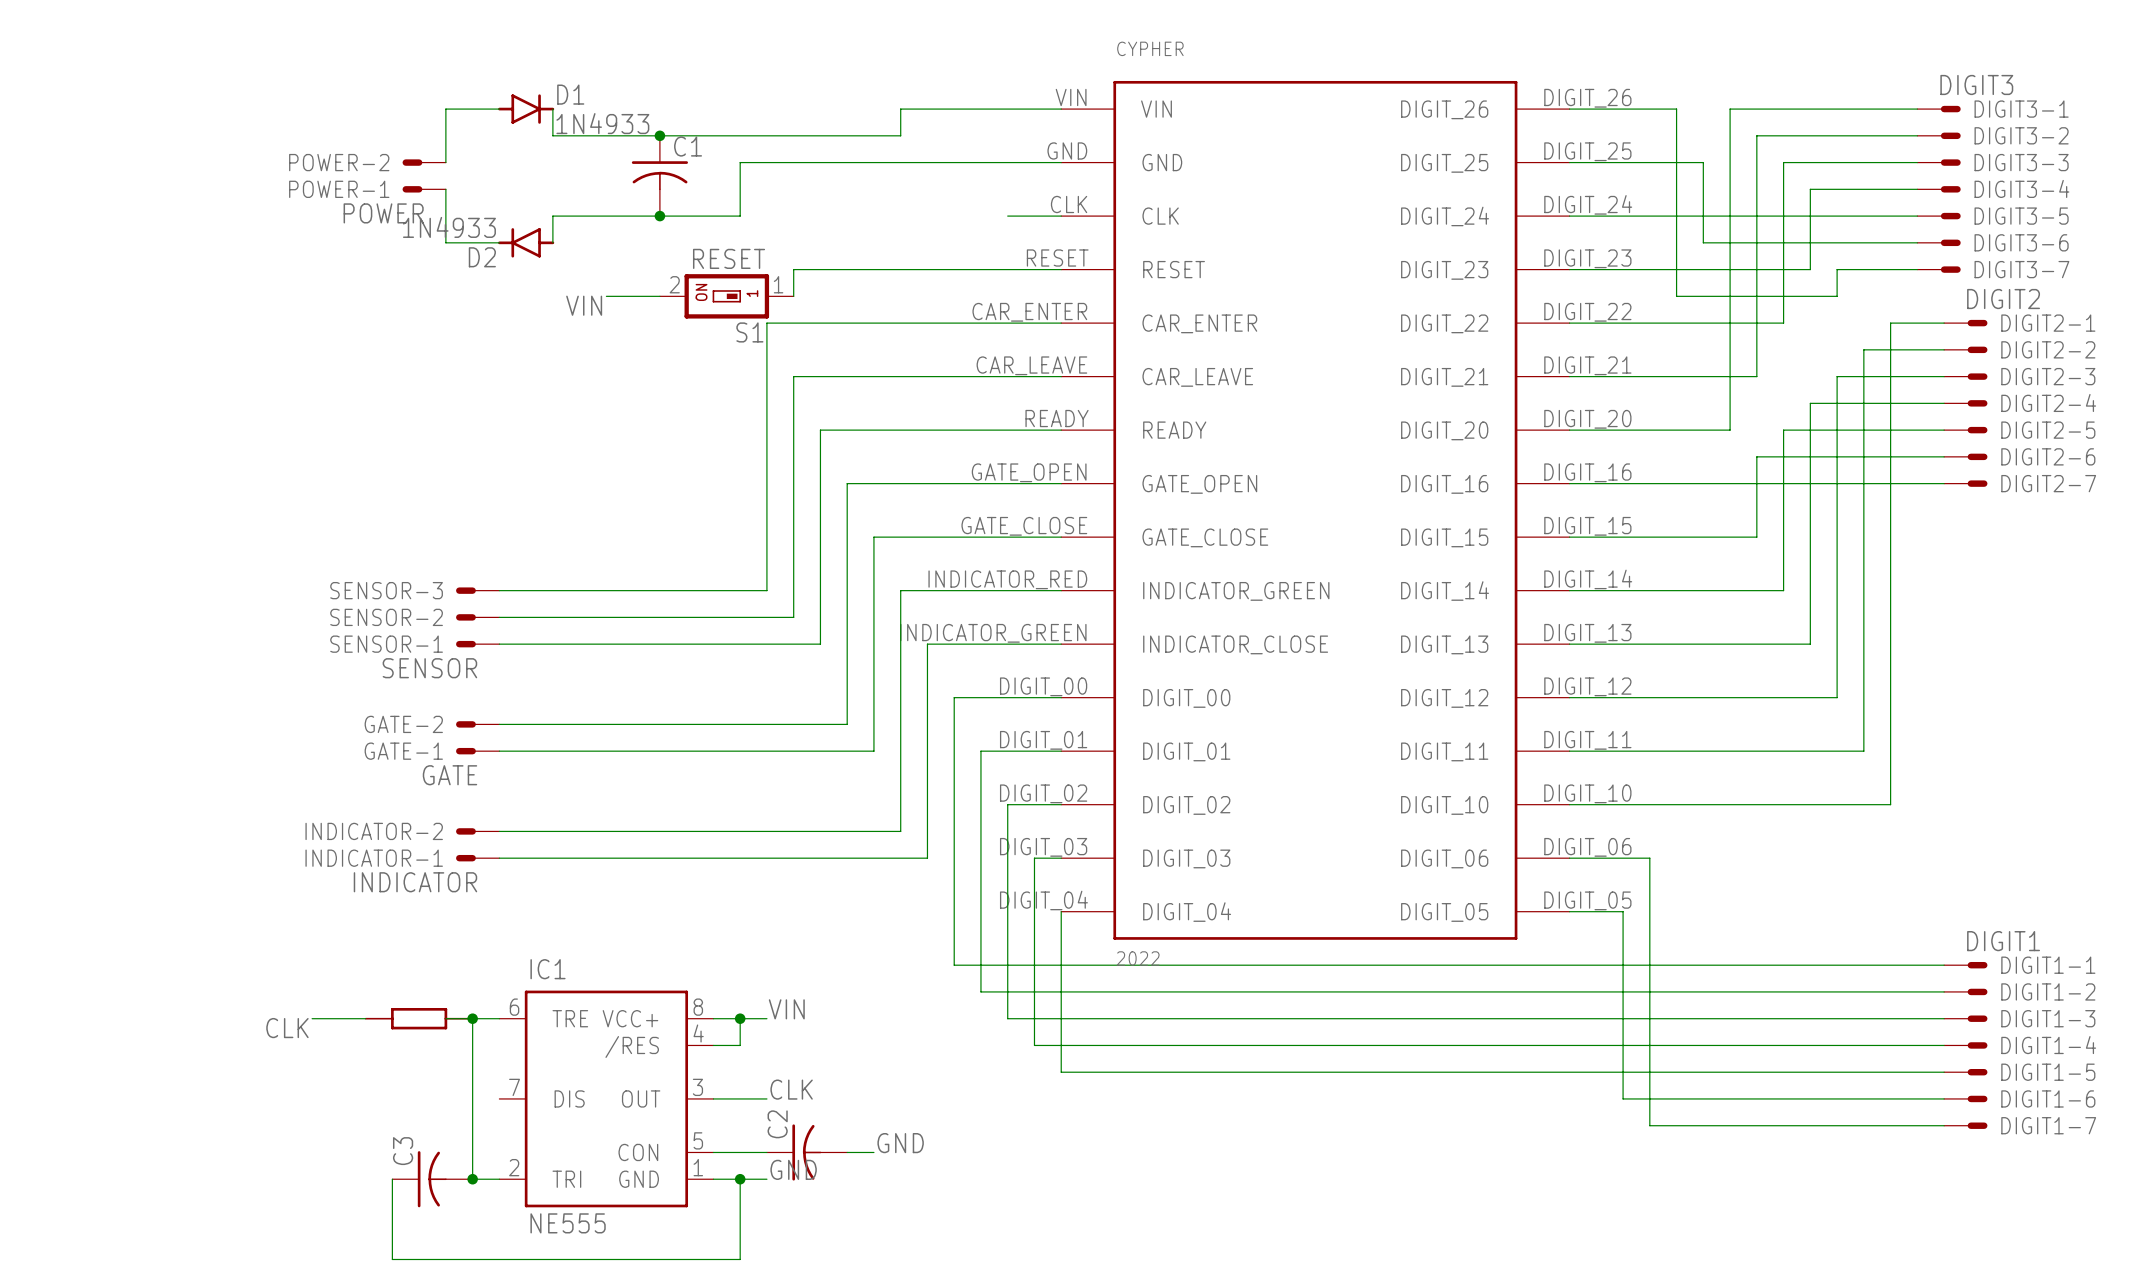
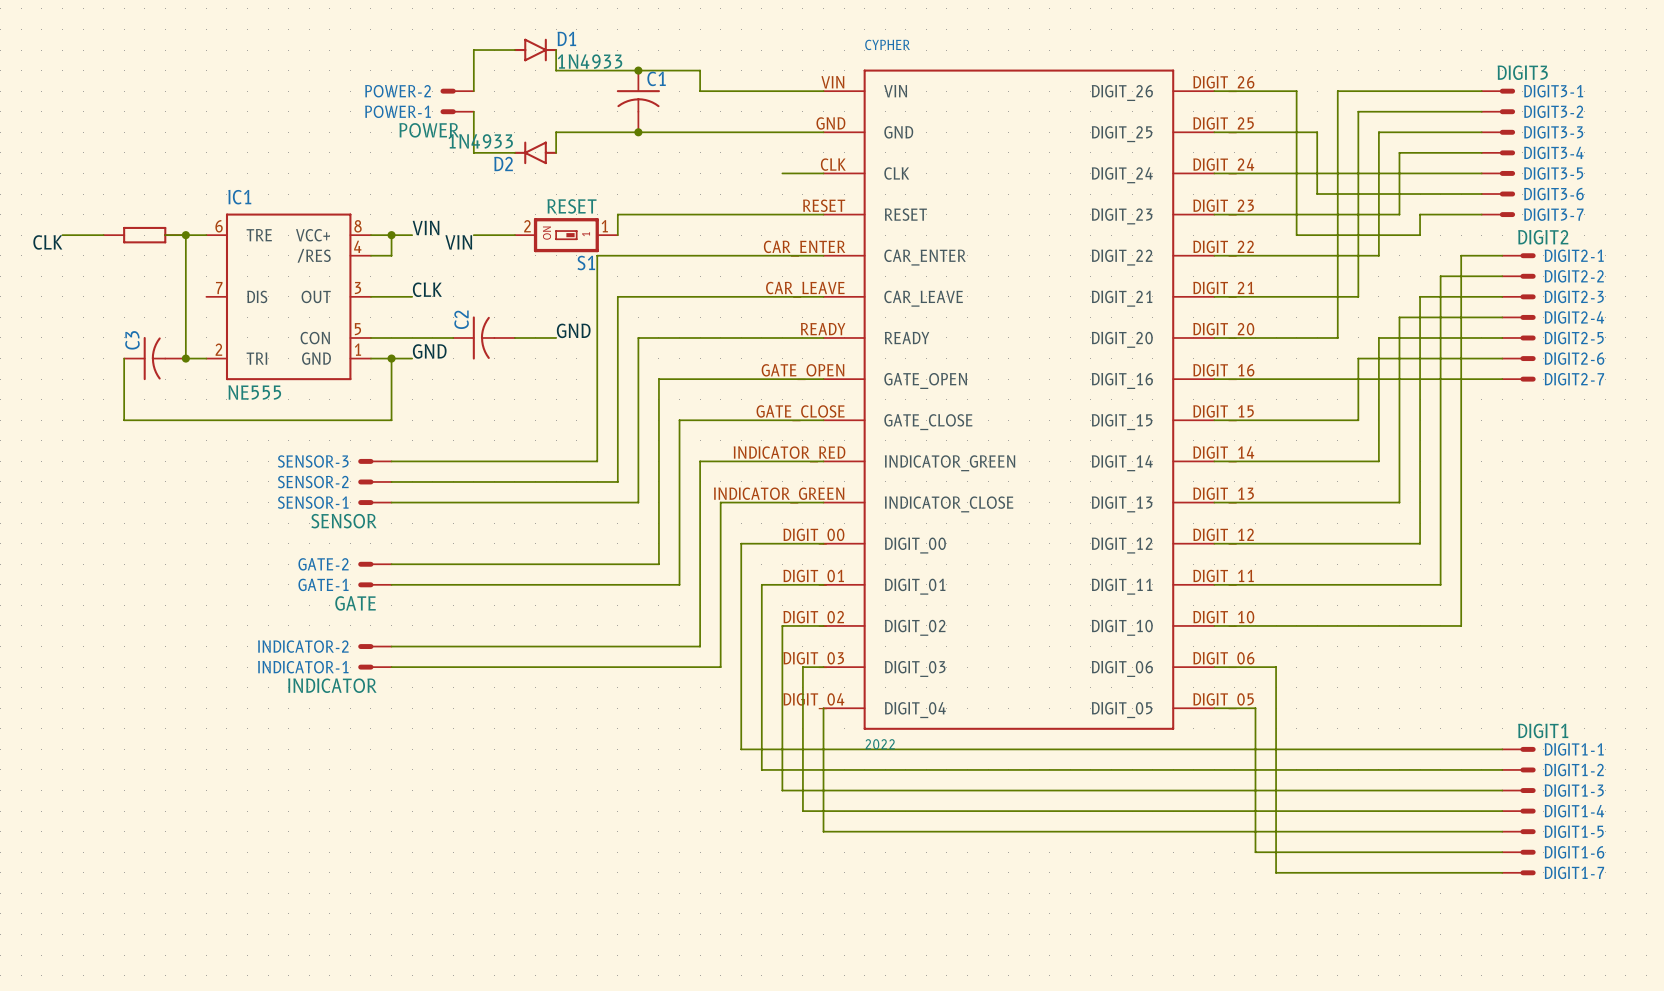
junction: none -> (638, 70)
wire: (499, 109) (445, 109) (445, 162) -> (514, 50) (473, 50) (473, 91)
D1 position: (526, 109) -> (535, 50)
wire: (552, 109) (552, 135) (900, 135) (900, 109) -> (556, 50) (556, 70) (700, 70) (700, 91)
junction: (659, 135) -> none
POWER-2 position: (424, 162) -> (457, 91)
wire: (740, 162) (740, 216) (552, 216) (552, 242) -> (576, 132) (556, 132) (556, 152)
junction: none -> (638, 132)
C1 position: (659, 175) -> (638, 101)
POWER-1 position: (424, 189) -> (457, 111)
wire: (445, 189) (445, 242) (499, 242) -> (473, 111) (473, 152) (514, 152)
junction: (659, 216) -> none
D2 position: (526, 242) -> (535, 152)
label: none -> VIN (426, 228)
wire: none -> (62, 235) (103, 235)
part: none -> (144, 235)
wire: none -> (165, 235) (206, 235)
wire: none -> (185, 235) (185, 358) (206, 358)
junction: none -> (185, 235)
wire: none -> (370, 235) (412, 235)
wire: none -> (391, 235) (391, 255) (370, 255)
junction: none -> (391, 235)
label: none -> CLK (47, 242)
label: none -> CLK (427, 289)
wire: none -> (370, 296) (412, 296)
label: none -> GND (573, 330)
wire: none -> (370, 337) (453, 337)
wire: none -> (514, 337) (556, 337)
label: none -> GND (429, 351)
wire: none -> (124, 358) (124, 420) (391, 420) (391, 358)
junction: none -> (185, 358)
wire: none -> (370, 358) (412, 358)
junction: none -> (391, 358)
label: VIN (786, 1009) -> none
wire: (312, 1018) (365, 1018) -> none
part: (419, 1018) -> none
wire: (445, 1018) (499, 1018) -> none
wire: (472, 1018) (472, 1179) (499, 1179) -> none
junction: (472, 1018) -> none
wire: (713, 1018) (766, 1018) -> none
wire: (740, 1018) (740, 1045) (713, 1045) -> none
junction: (740, 1018) -> none
label: CLK (287, 1028) -> none
label: CLK (791, 1089) -> none
IC1 position: (606, 1098) -> (288, 296)
wire: (713, 1098) (766, 1098) -> none
label: GND (900, 1143) -> none
wire: (713, 1152) (766, 1152) -> none
C2 position: (807, 1152) -> (484, 337)
wire: (847, 1152) (873, 1152) -> none
label: GND (793, 1169) -> none
wire: (392, 1179) (392, 1259) (740, 1259) (740, 1179) -> none
C3 position: (432, 1179) -> (154, 358)
junction: (472, 1179) -> none
wire: (713, 1179) (766, 1179) -> none
junction: (740, 1179) -> none

